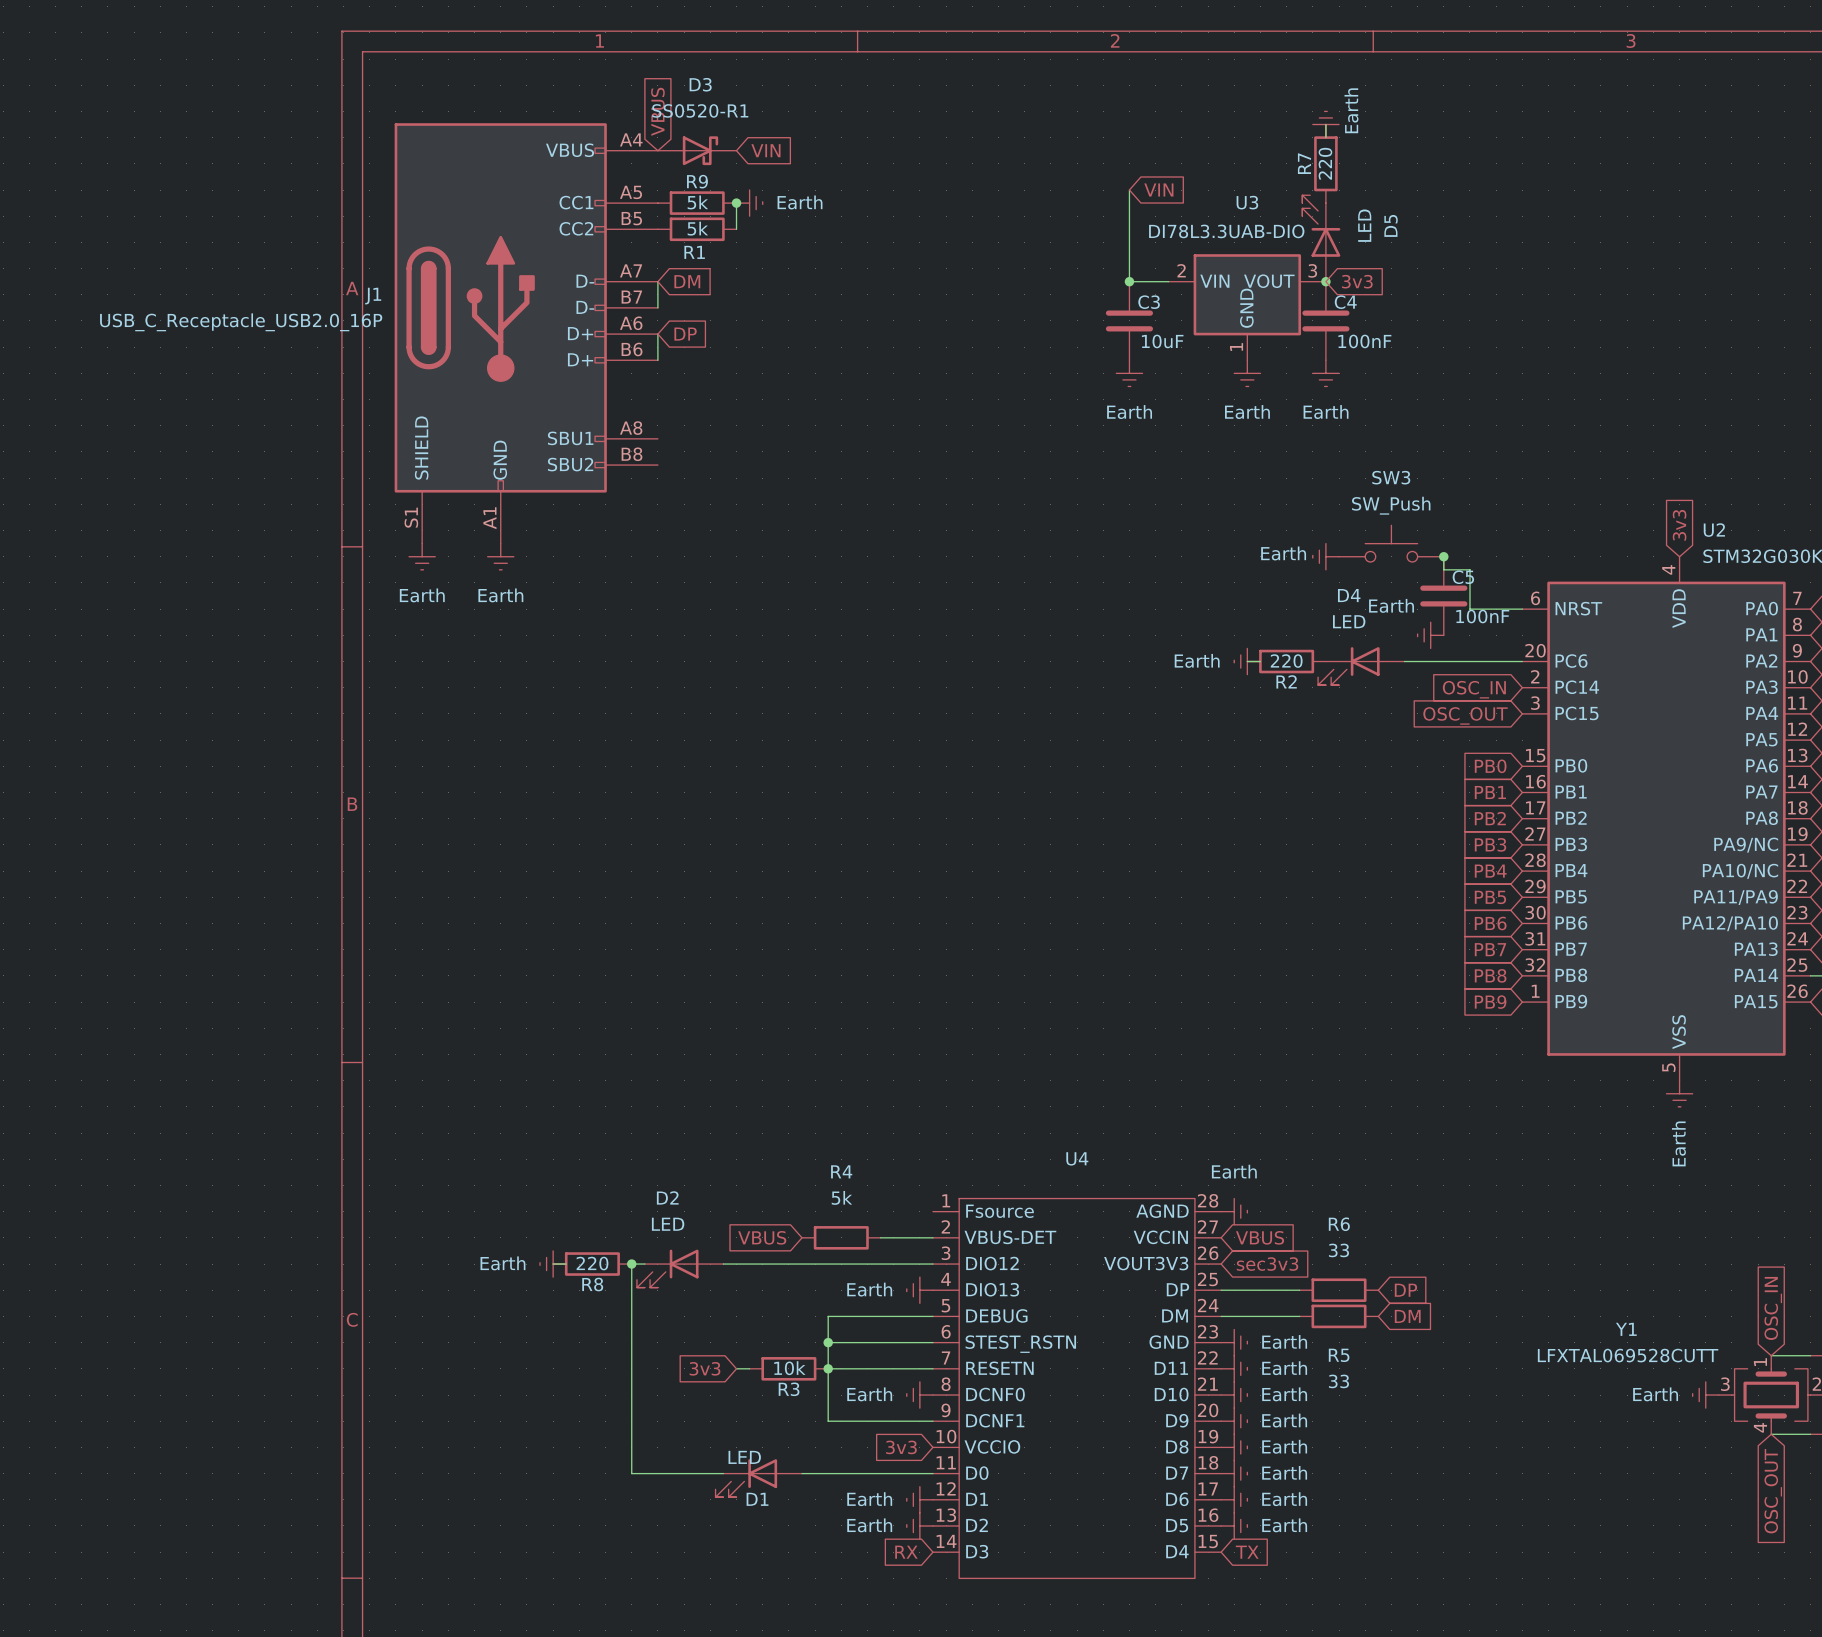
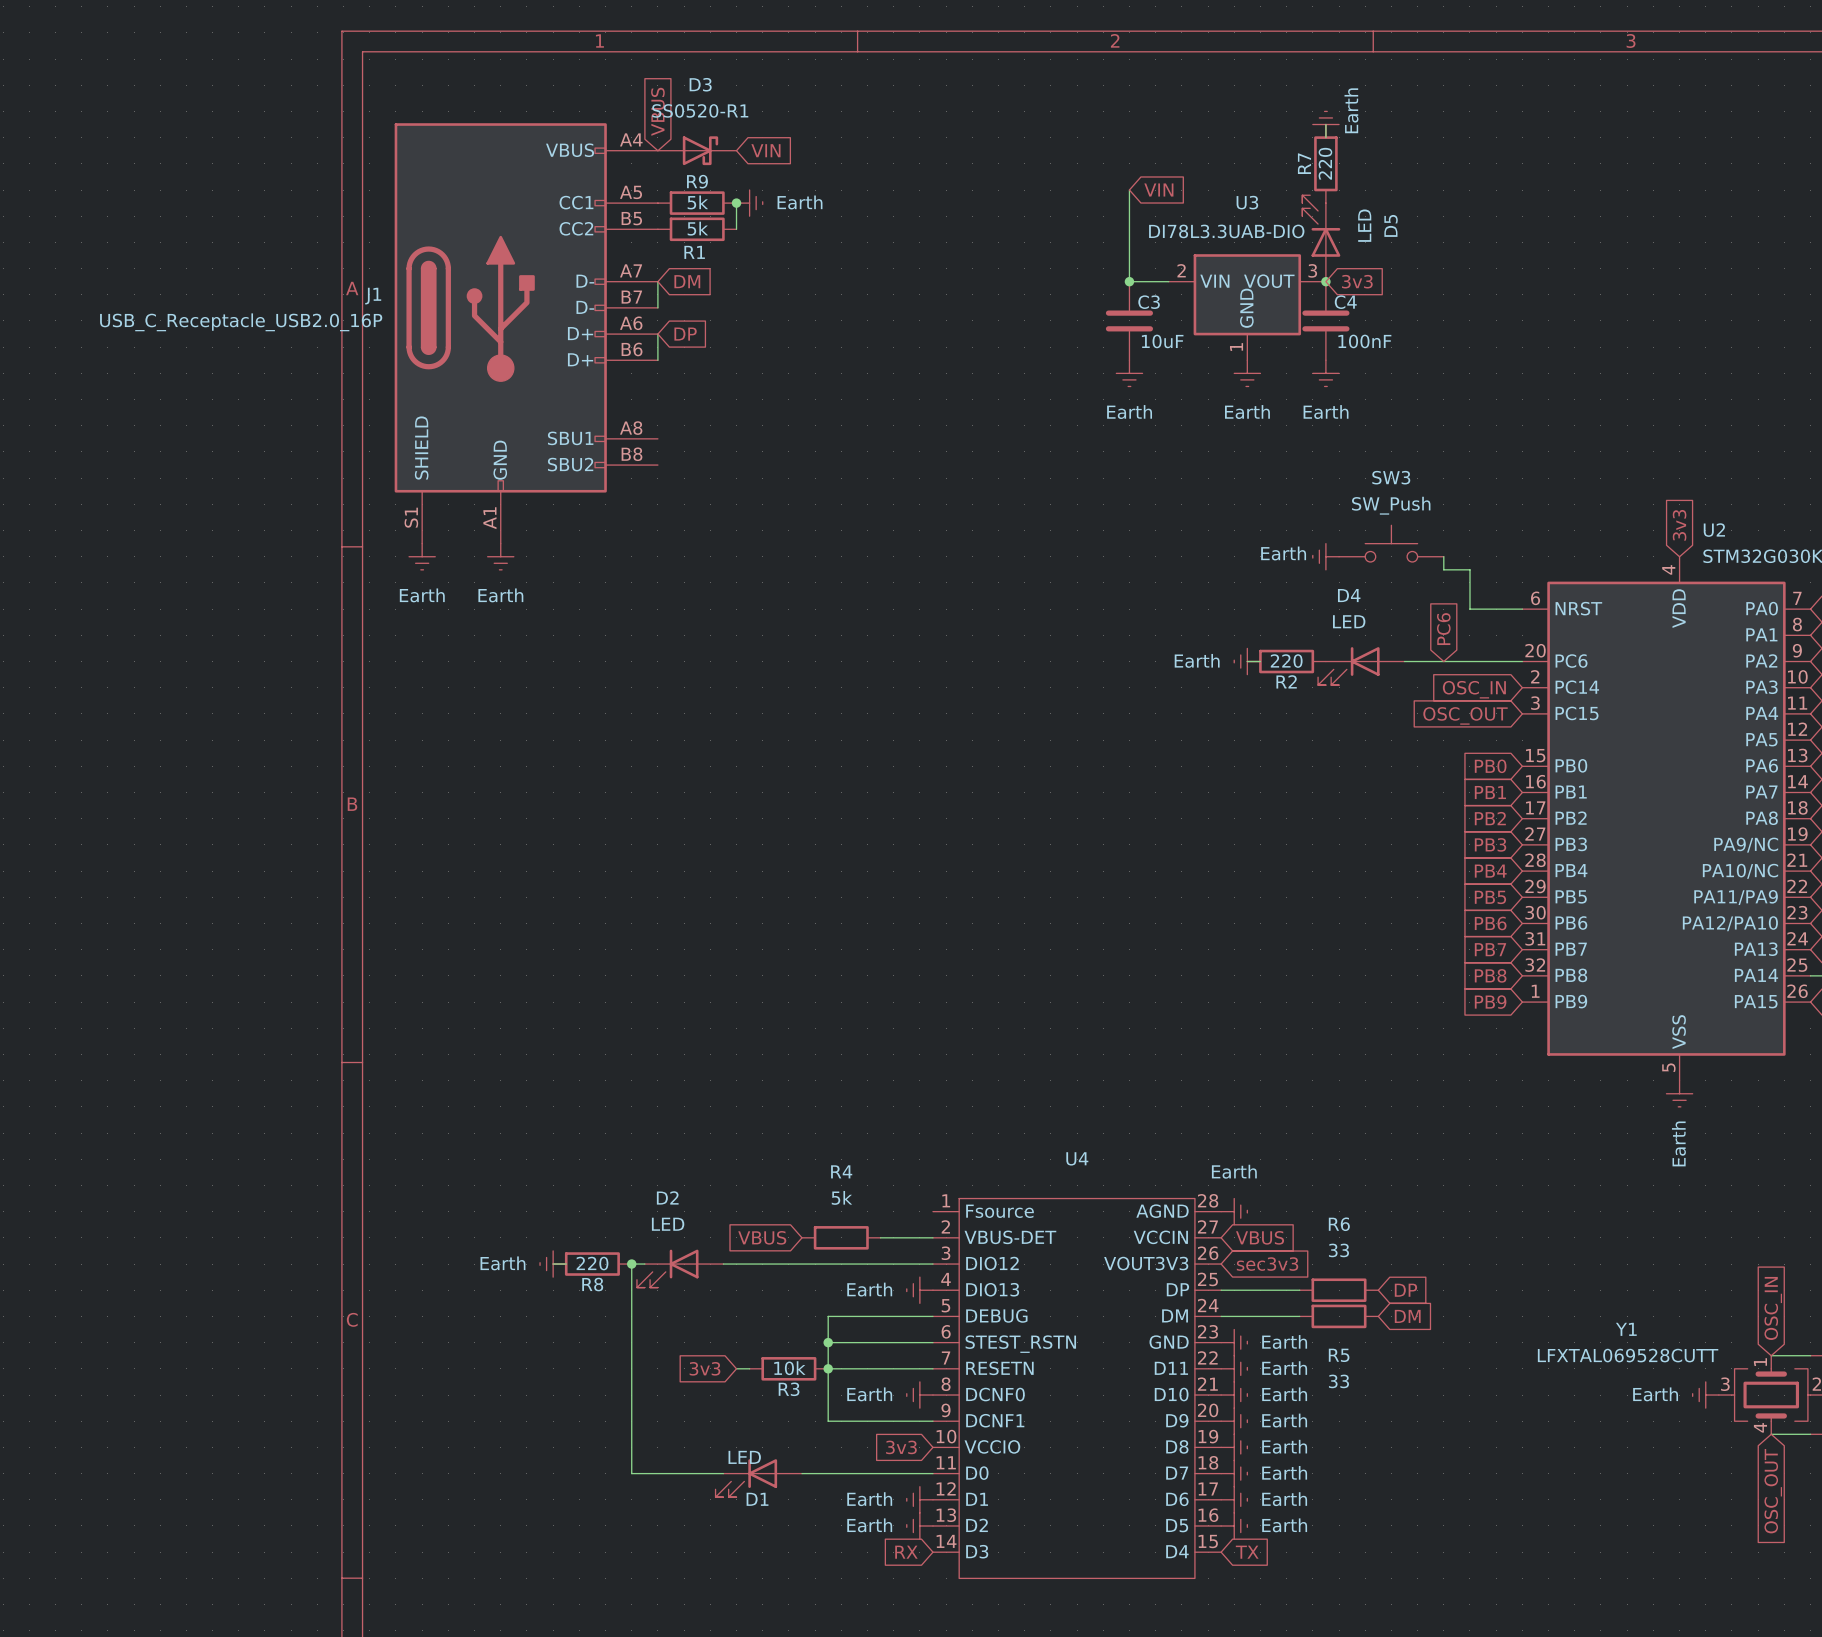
junction: (1443, 556) -> none
C5: 100nF (1443, 596) -> none
global label: none -> PC6 (1443, 629)
power symbol: Earth (1430, 635) -> none

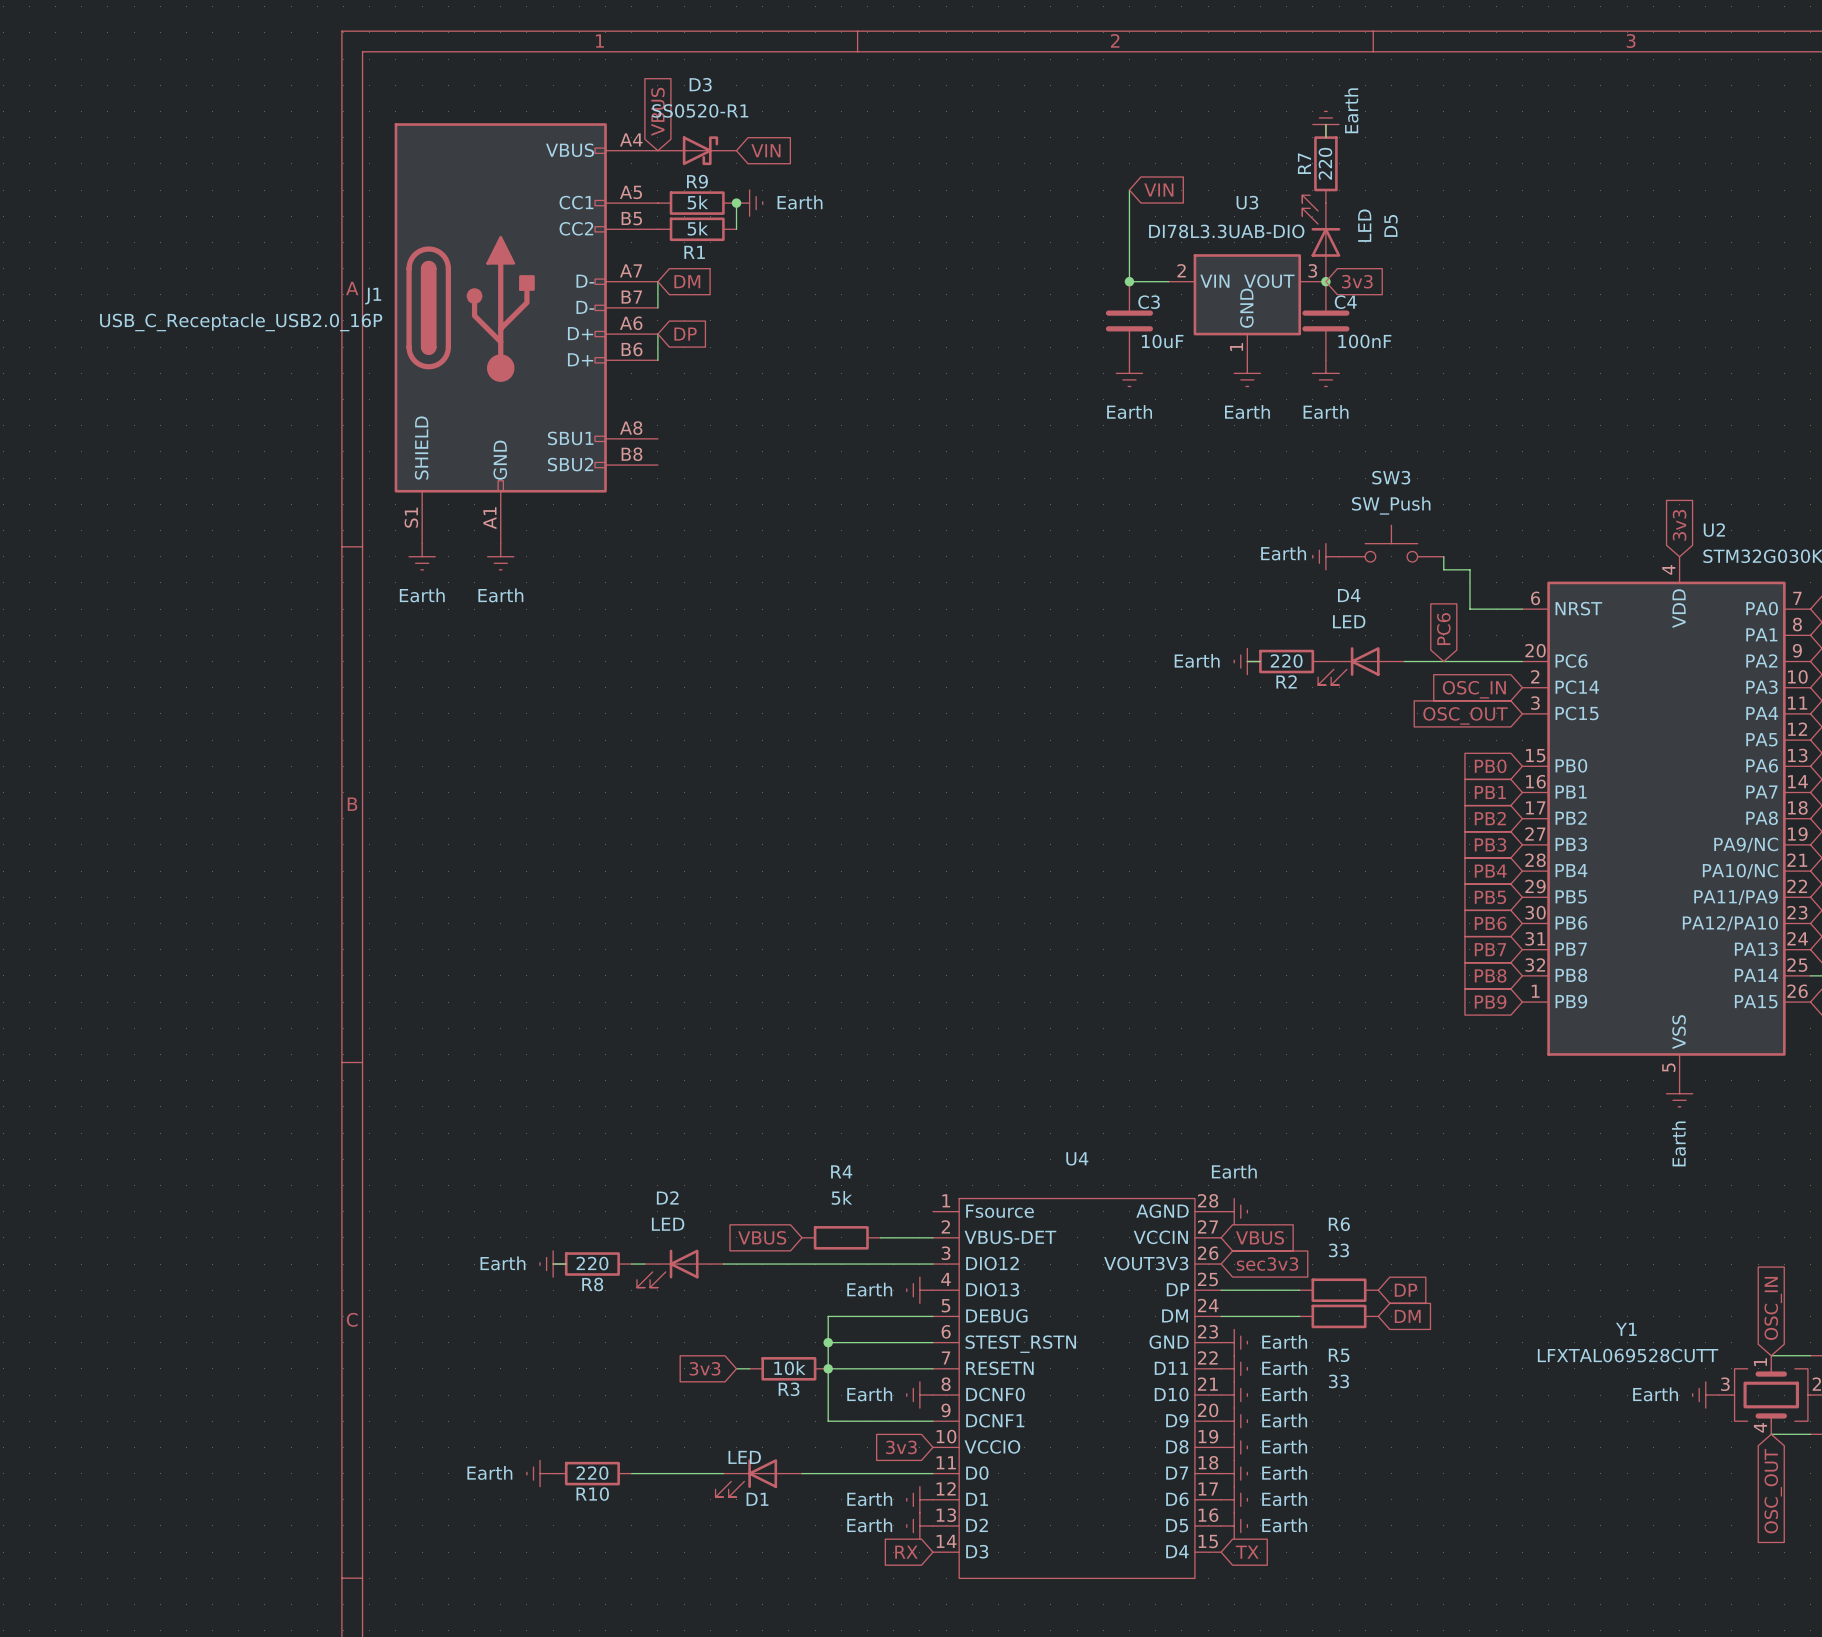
wire: (631, 1264) (631, 1473) -> none
junction: (631, 1264) -> none
power symbol: none -> Earth (540, 1473)
R10: none -> 220 (592, 1473)

